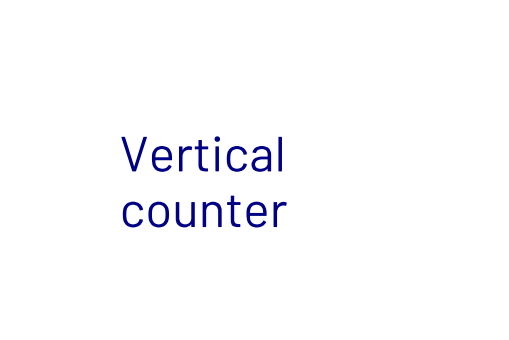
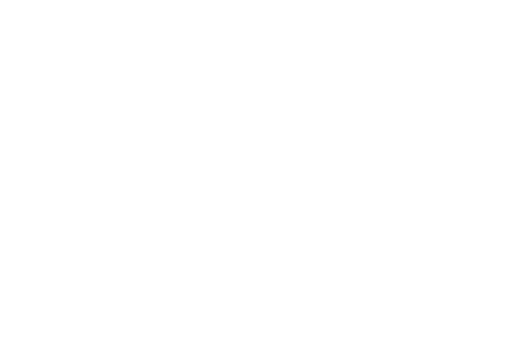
text: Vertical (201, 154) -> none
text: counter (204, 211) -> none

